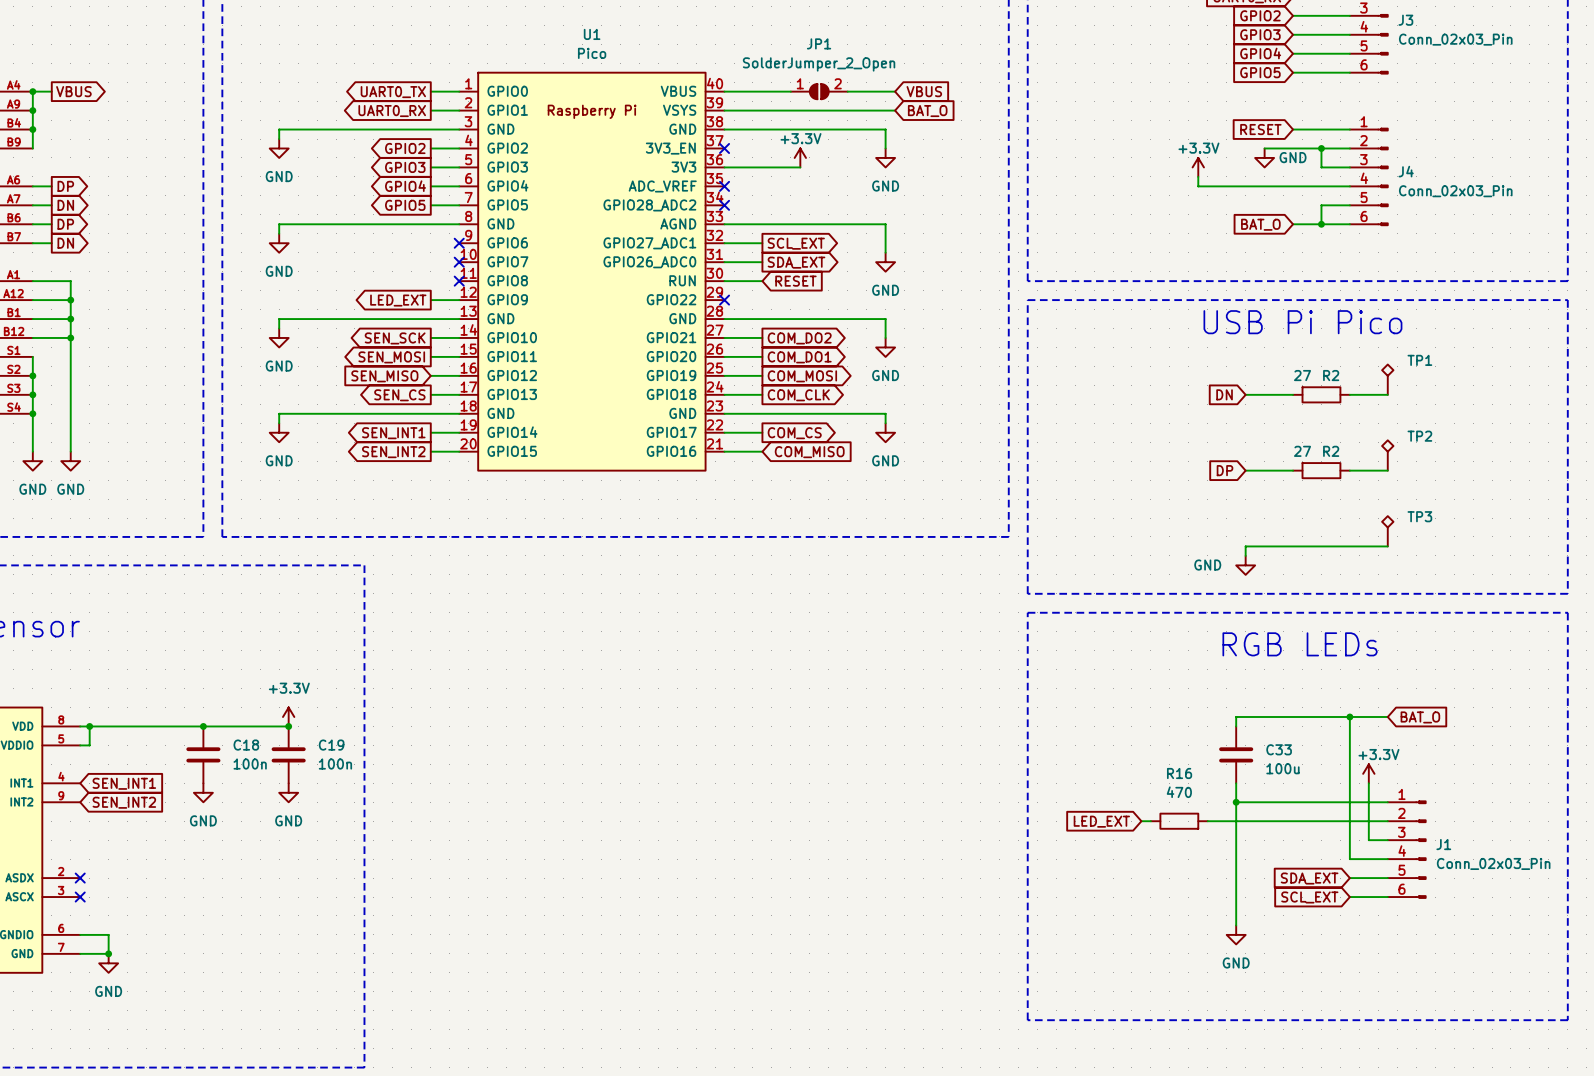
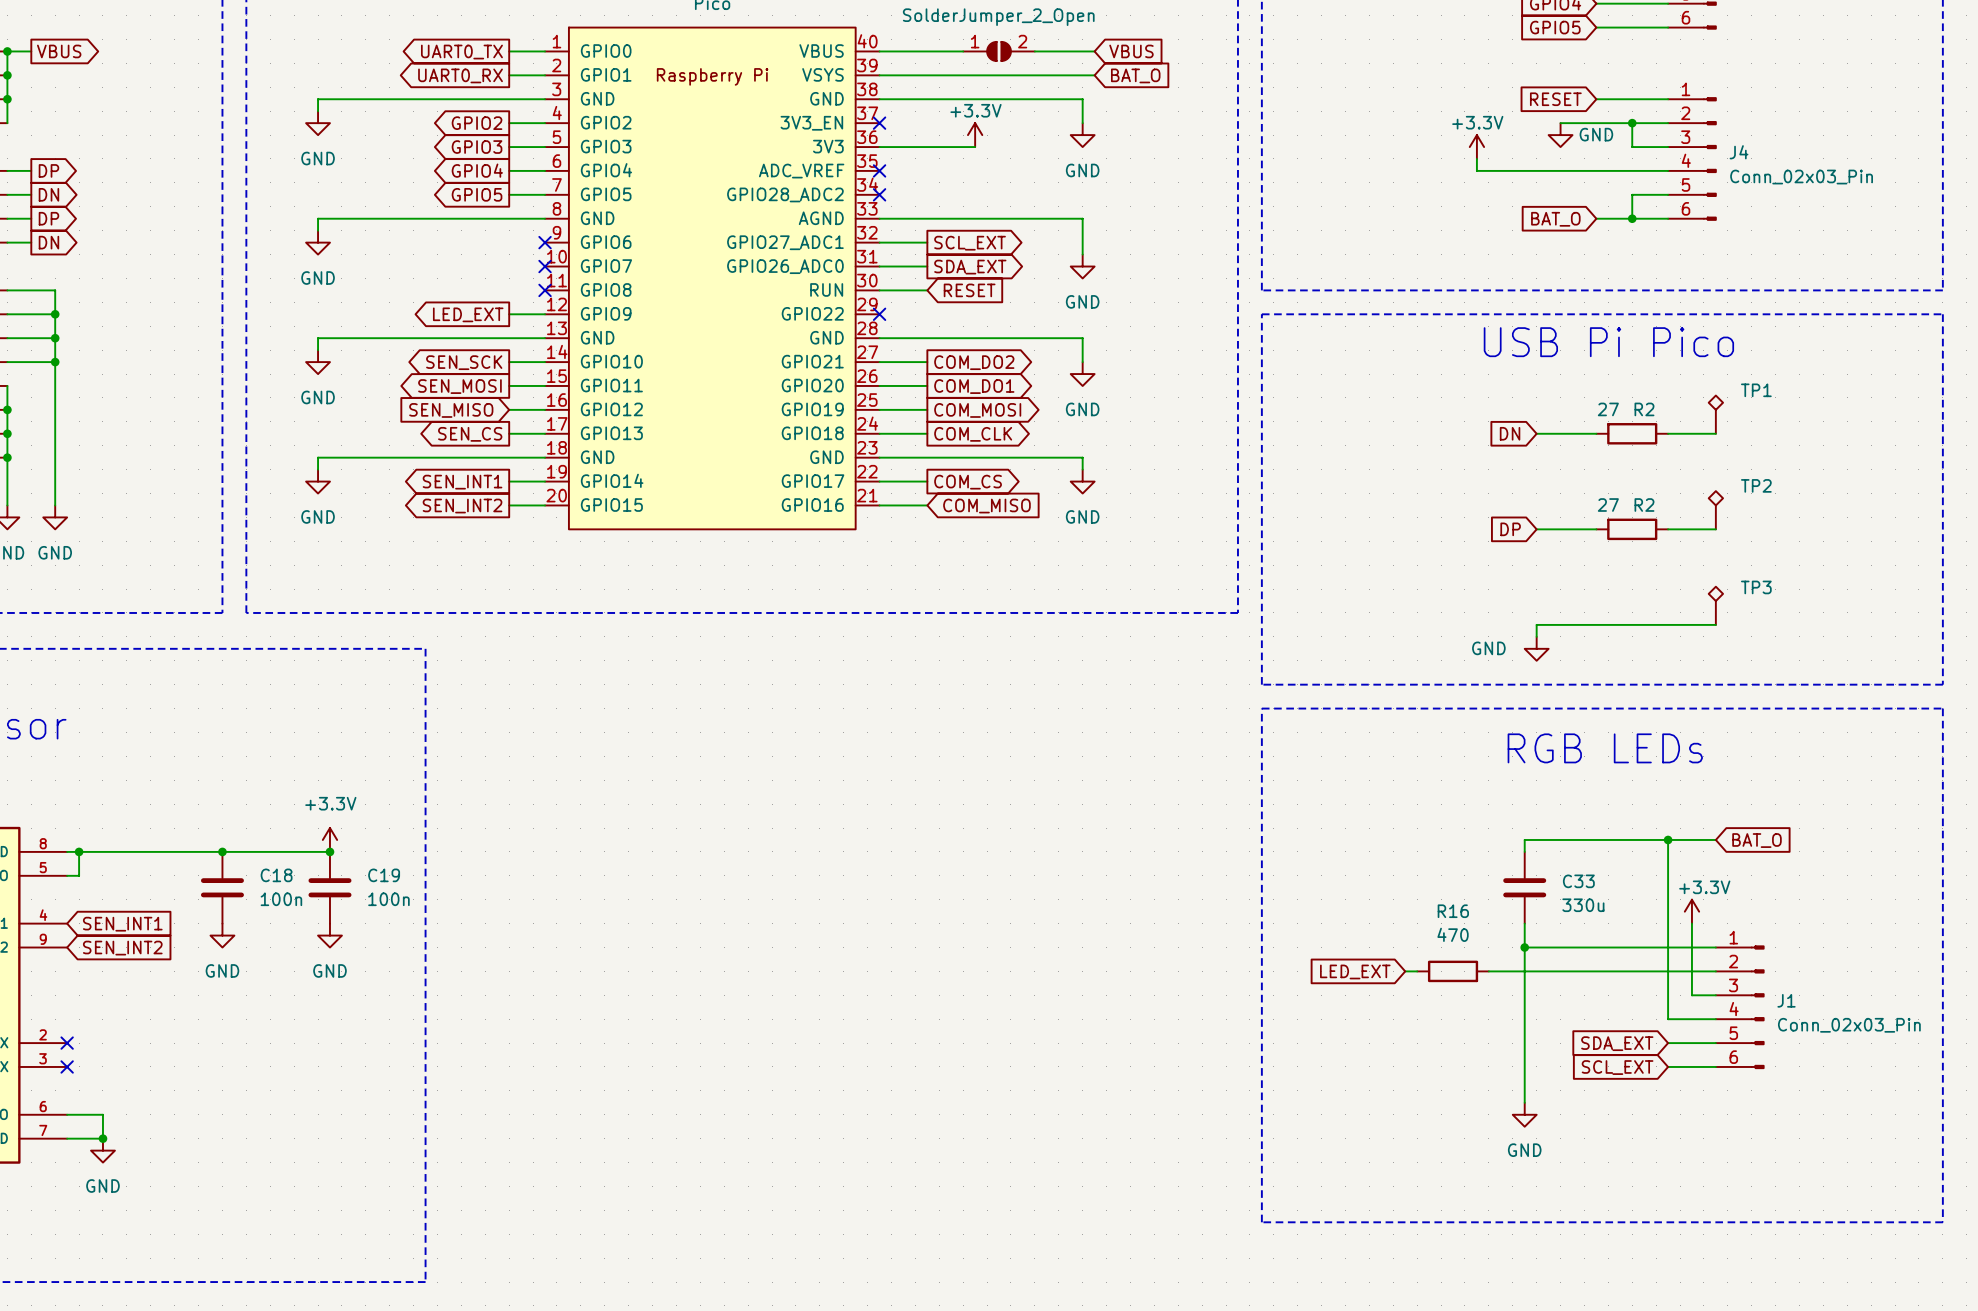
C33 value: 100u (1282, 768) -> 330u (1583, 905)

